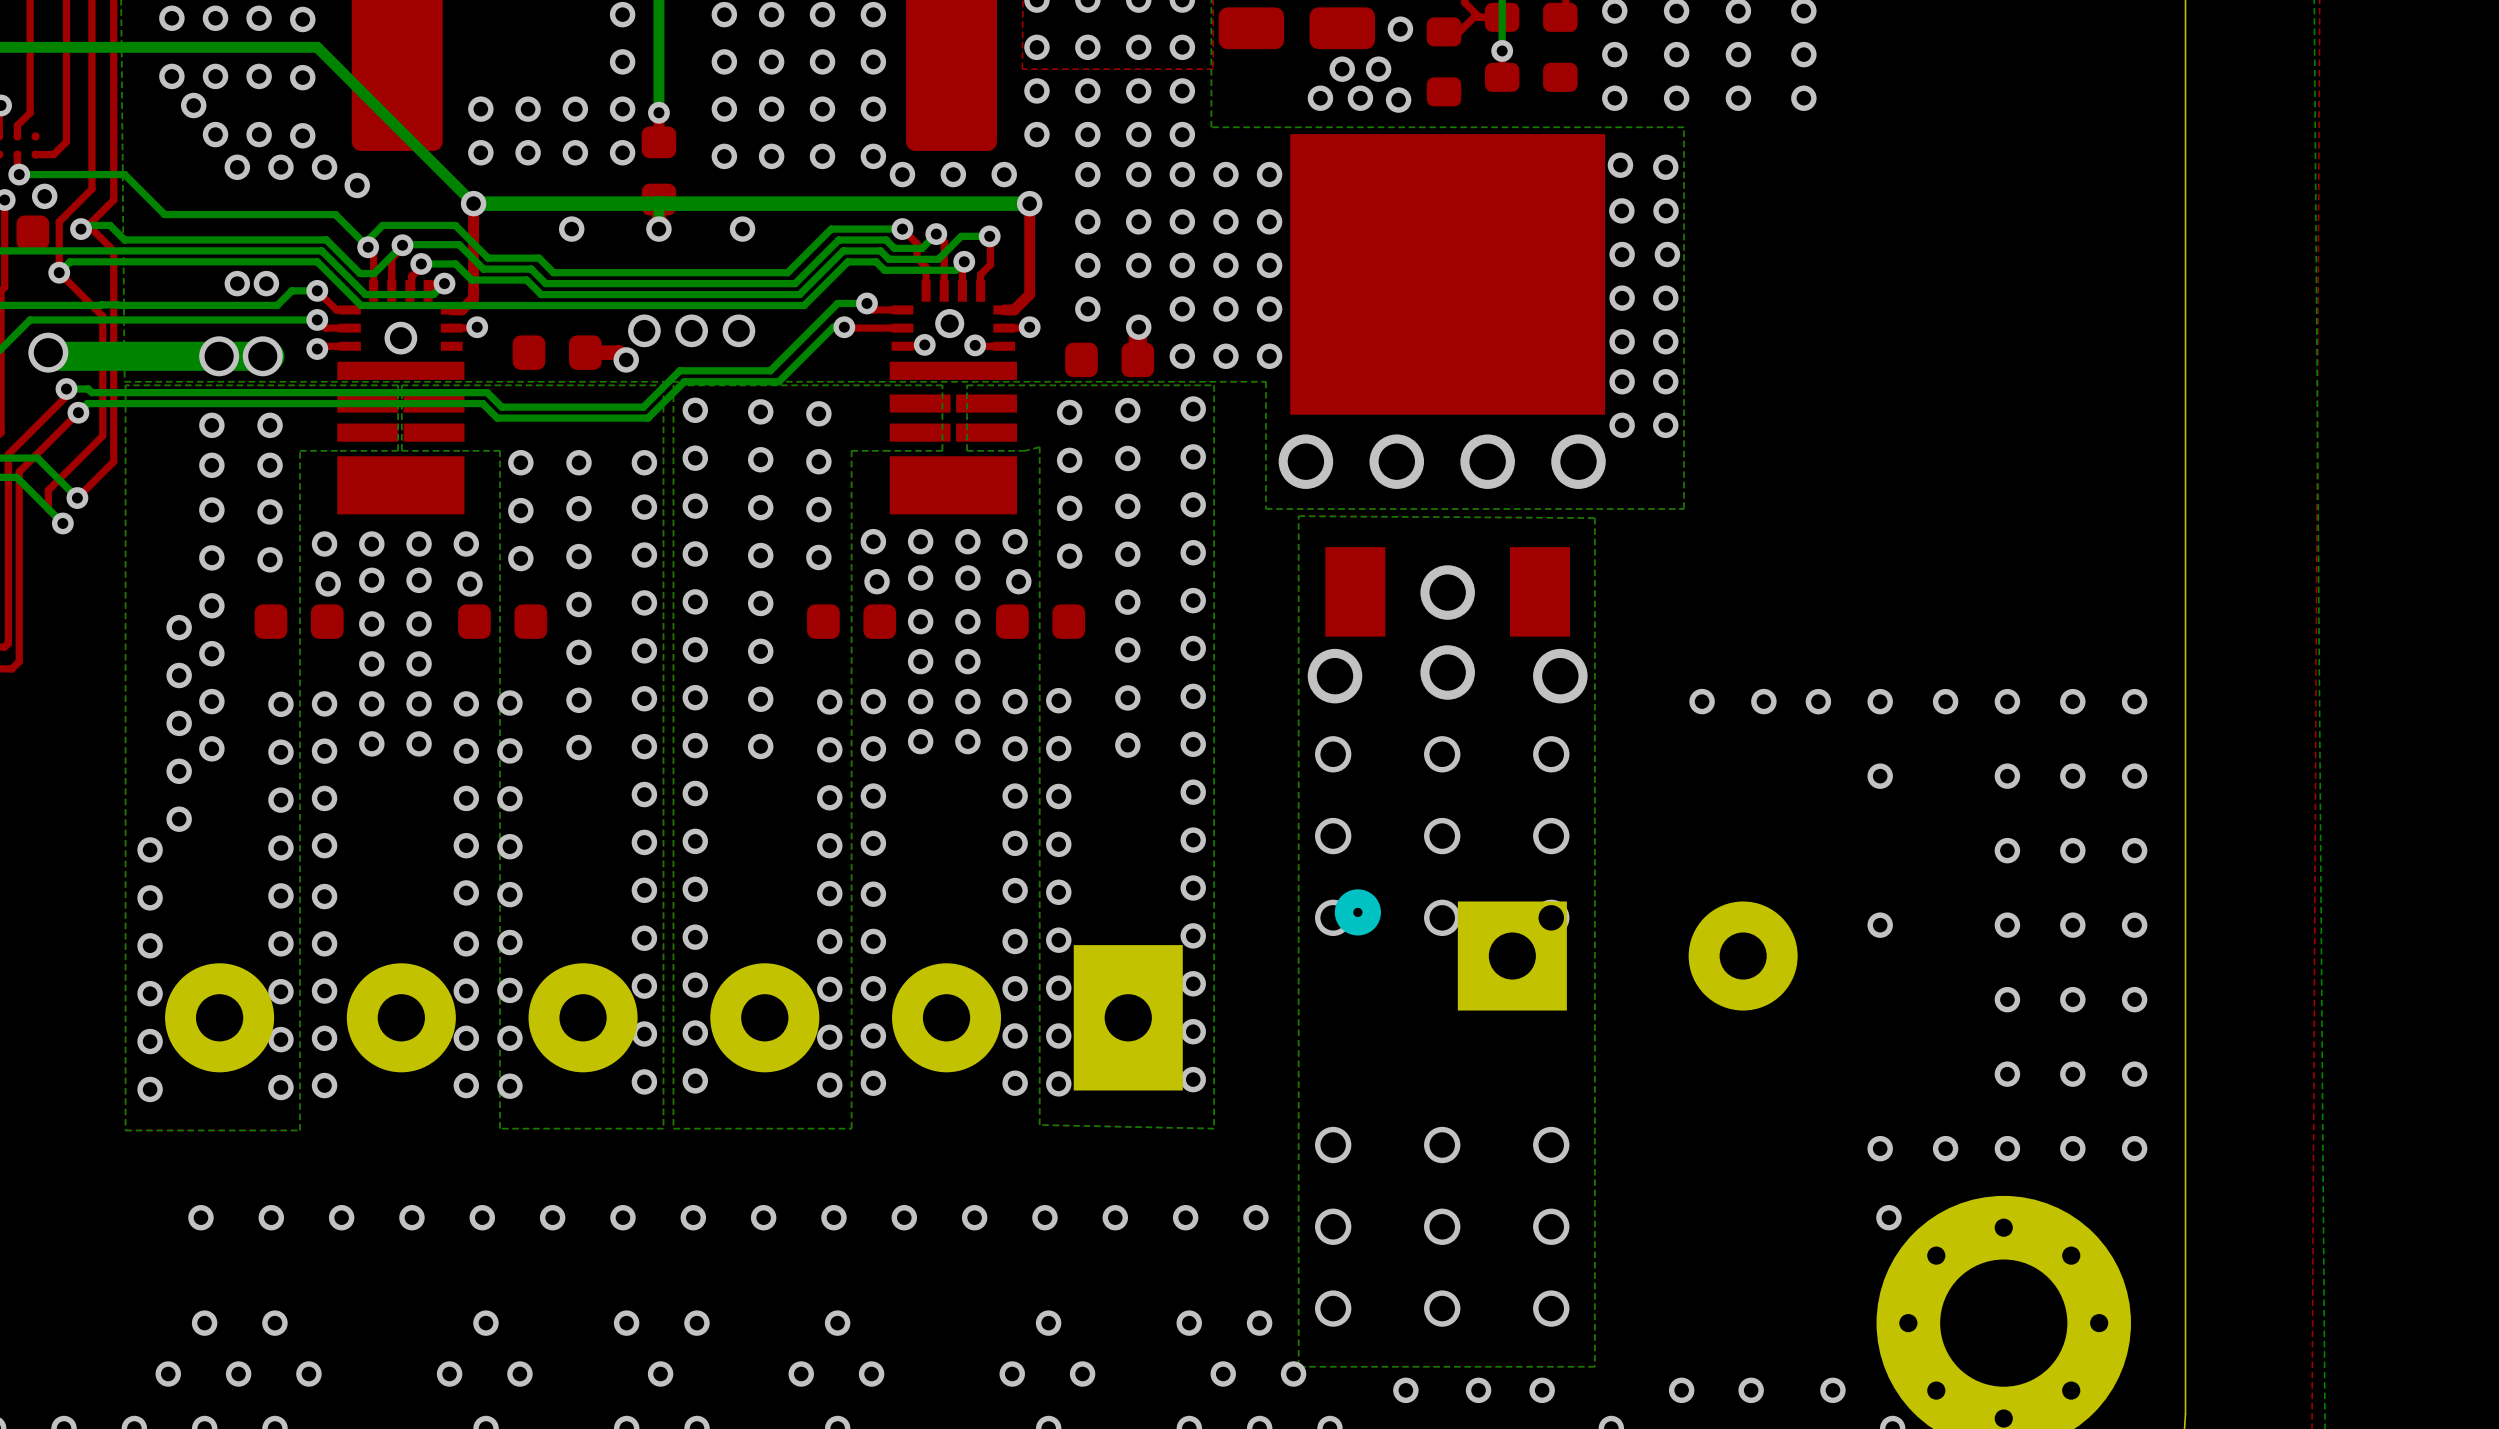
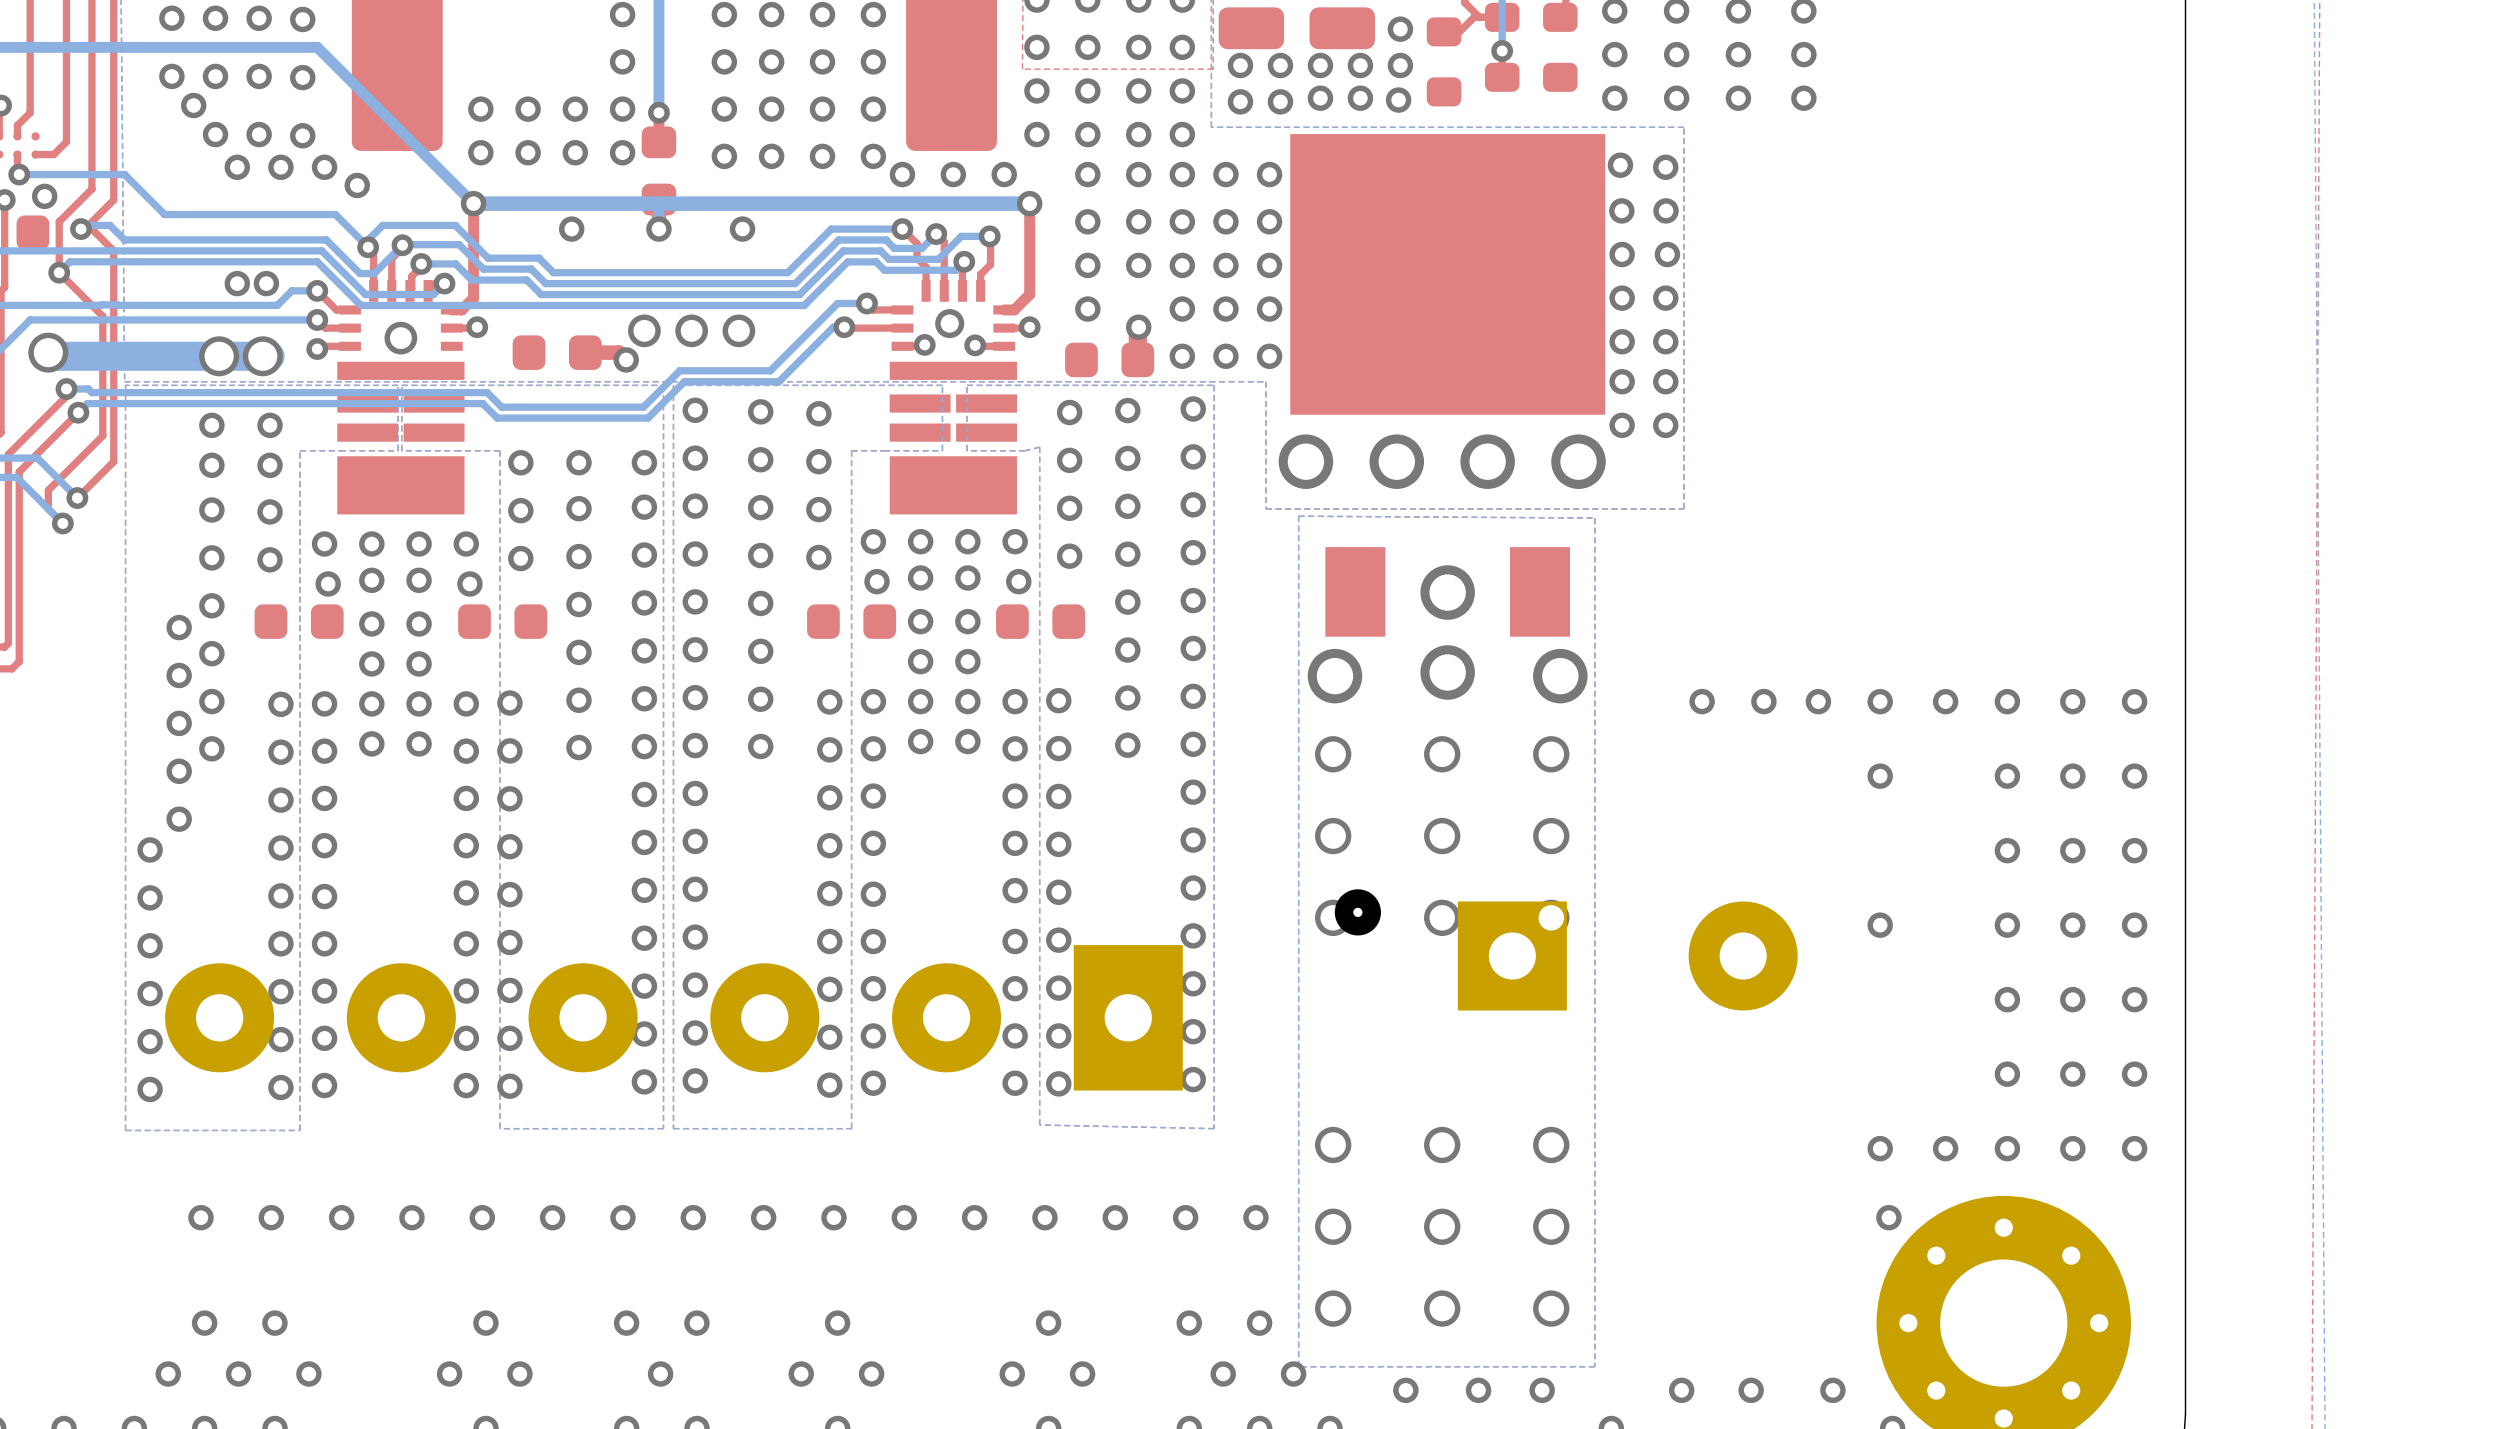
via: none -> (1240, 65)
via: none -> (1280, 65)
via: none -> (1320, 65)
via: none -> (1360, 65)
via: none -> (1400, 65)
via: (1342, 69) -> none
via: (1378, 69) -> none
via: none -> (1240, 101)
via: none -> (1280, 101)

